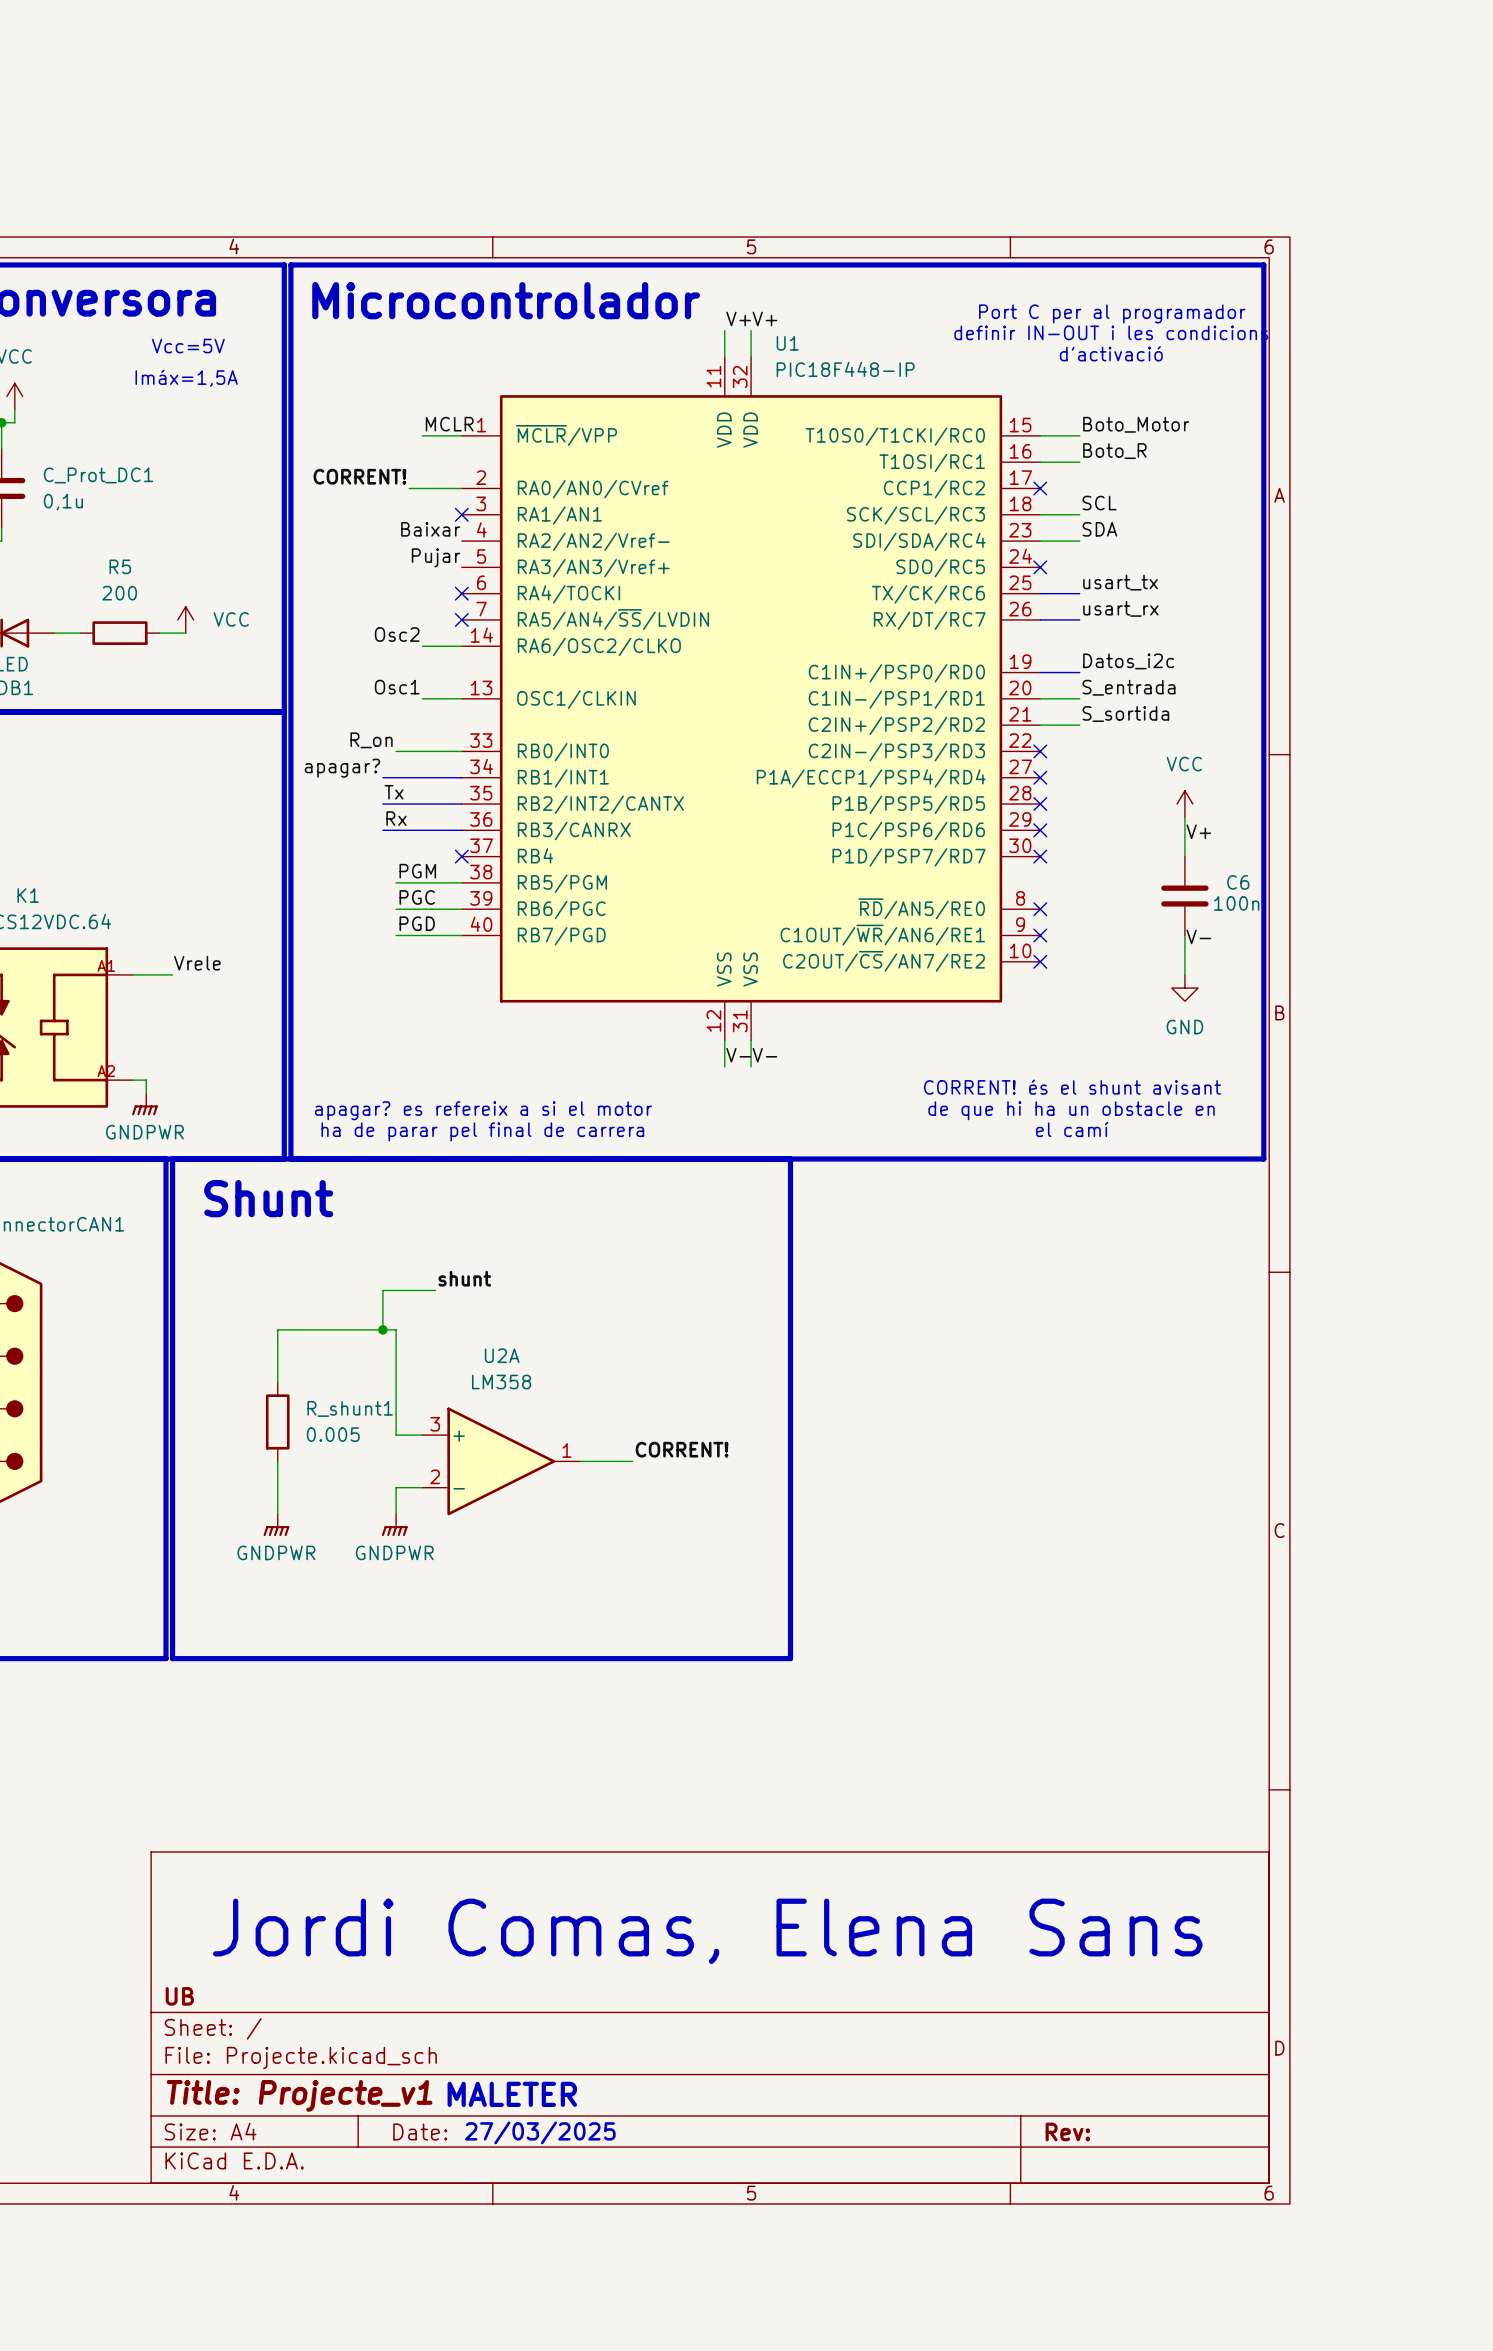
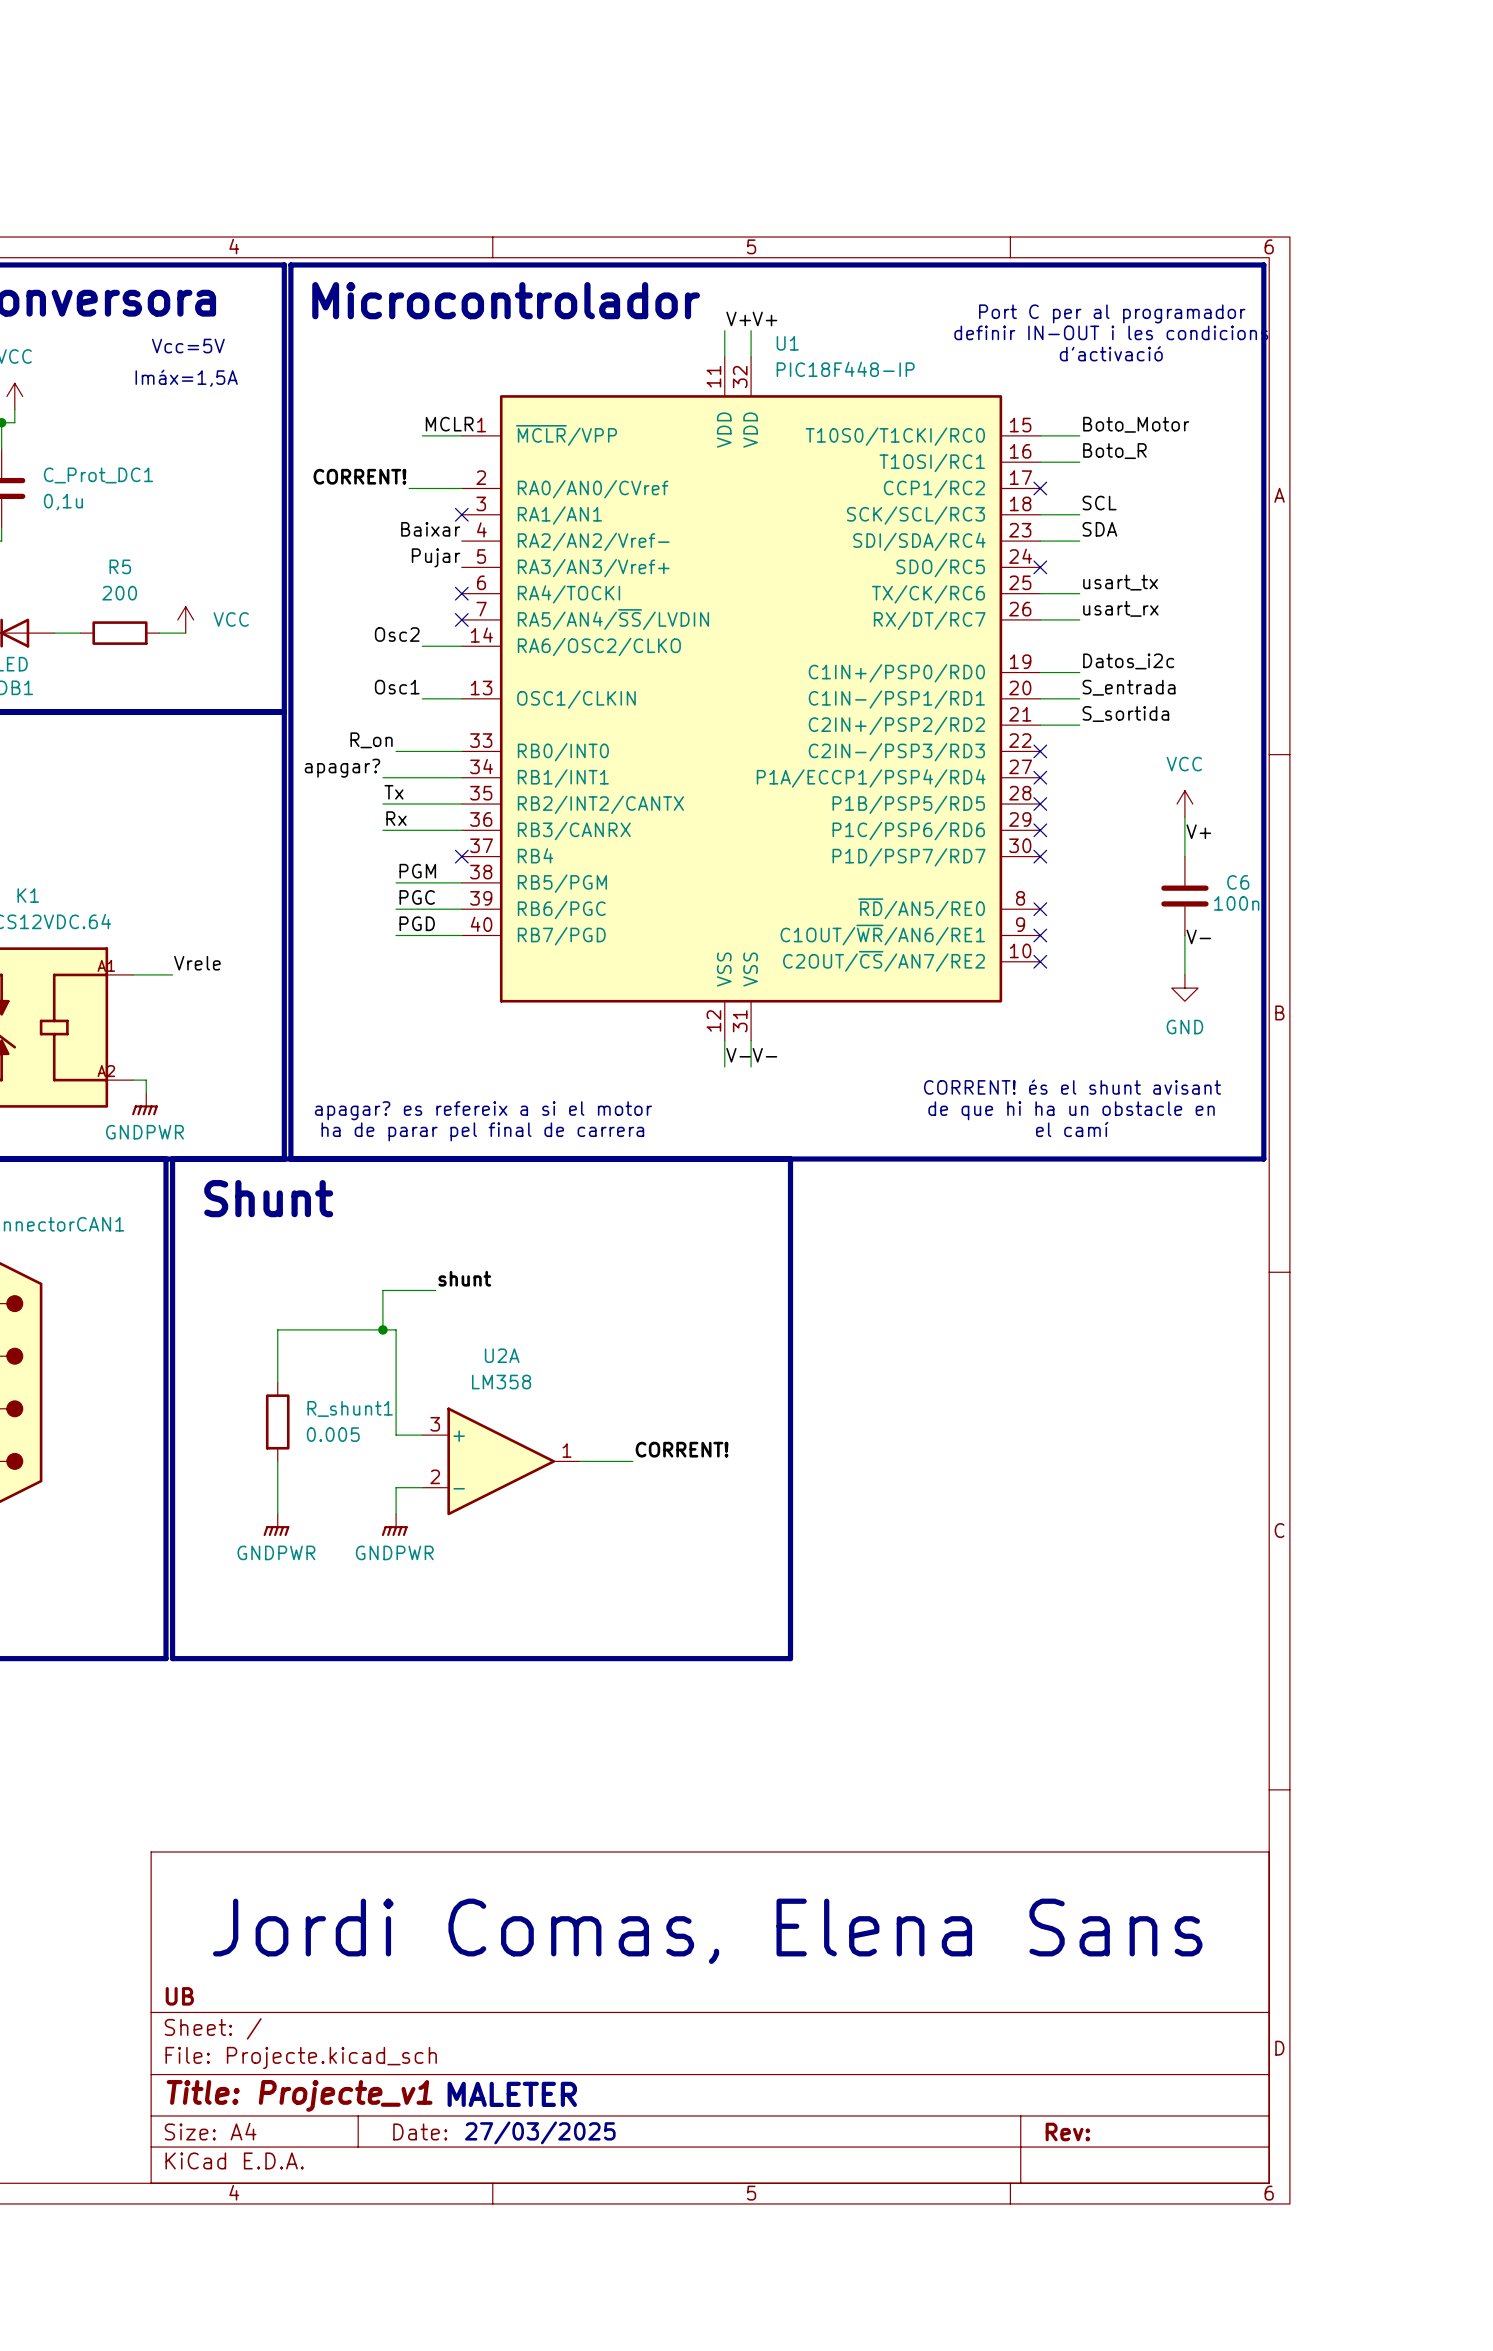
bus: (1040, 593) (1079, 593) -> none
bus: (1040, 619) (1079, 619) -> none
bus: (1040, 672) (1079, 672) -> none
bus: (382, 777) (461, 777) -> none
bus: (382, 804) (461, 804) -> none
bus: (382, 830) (461, 830) -> none

